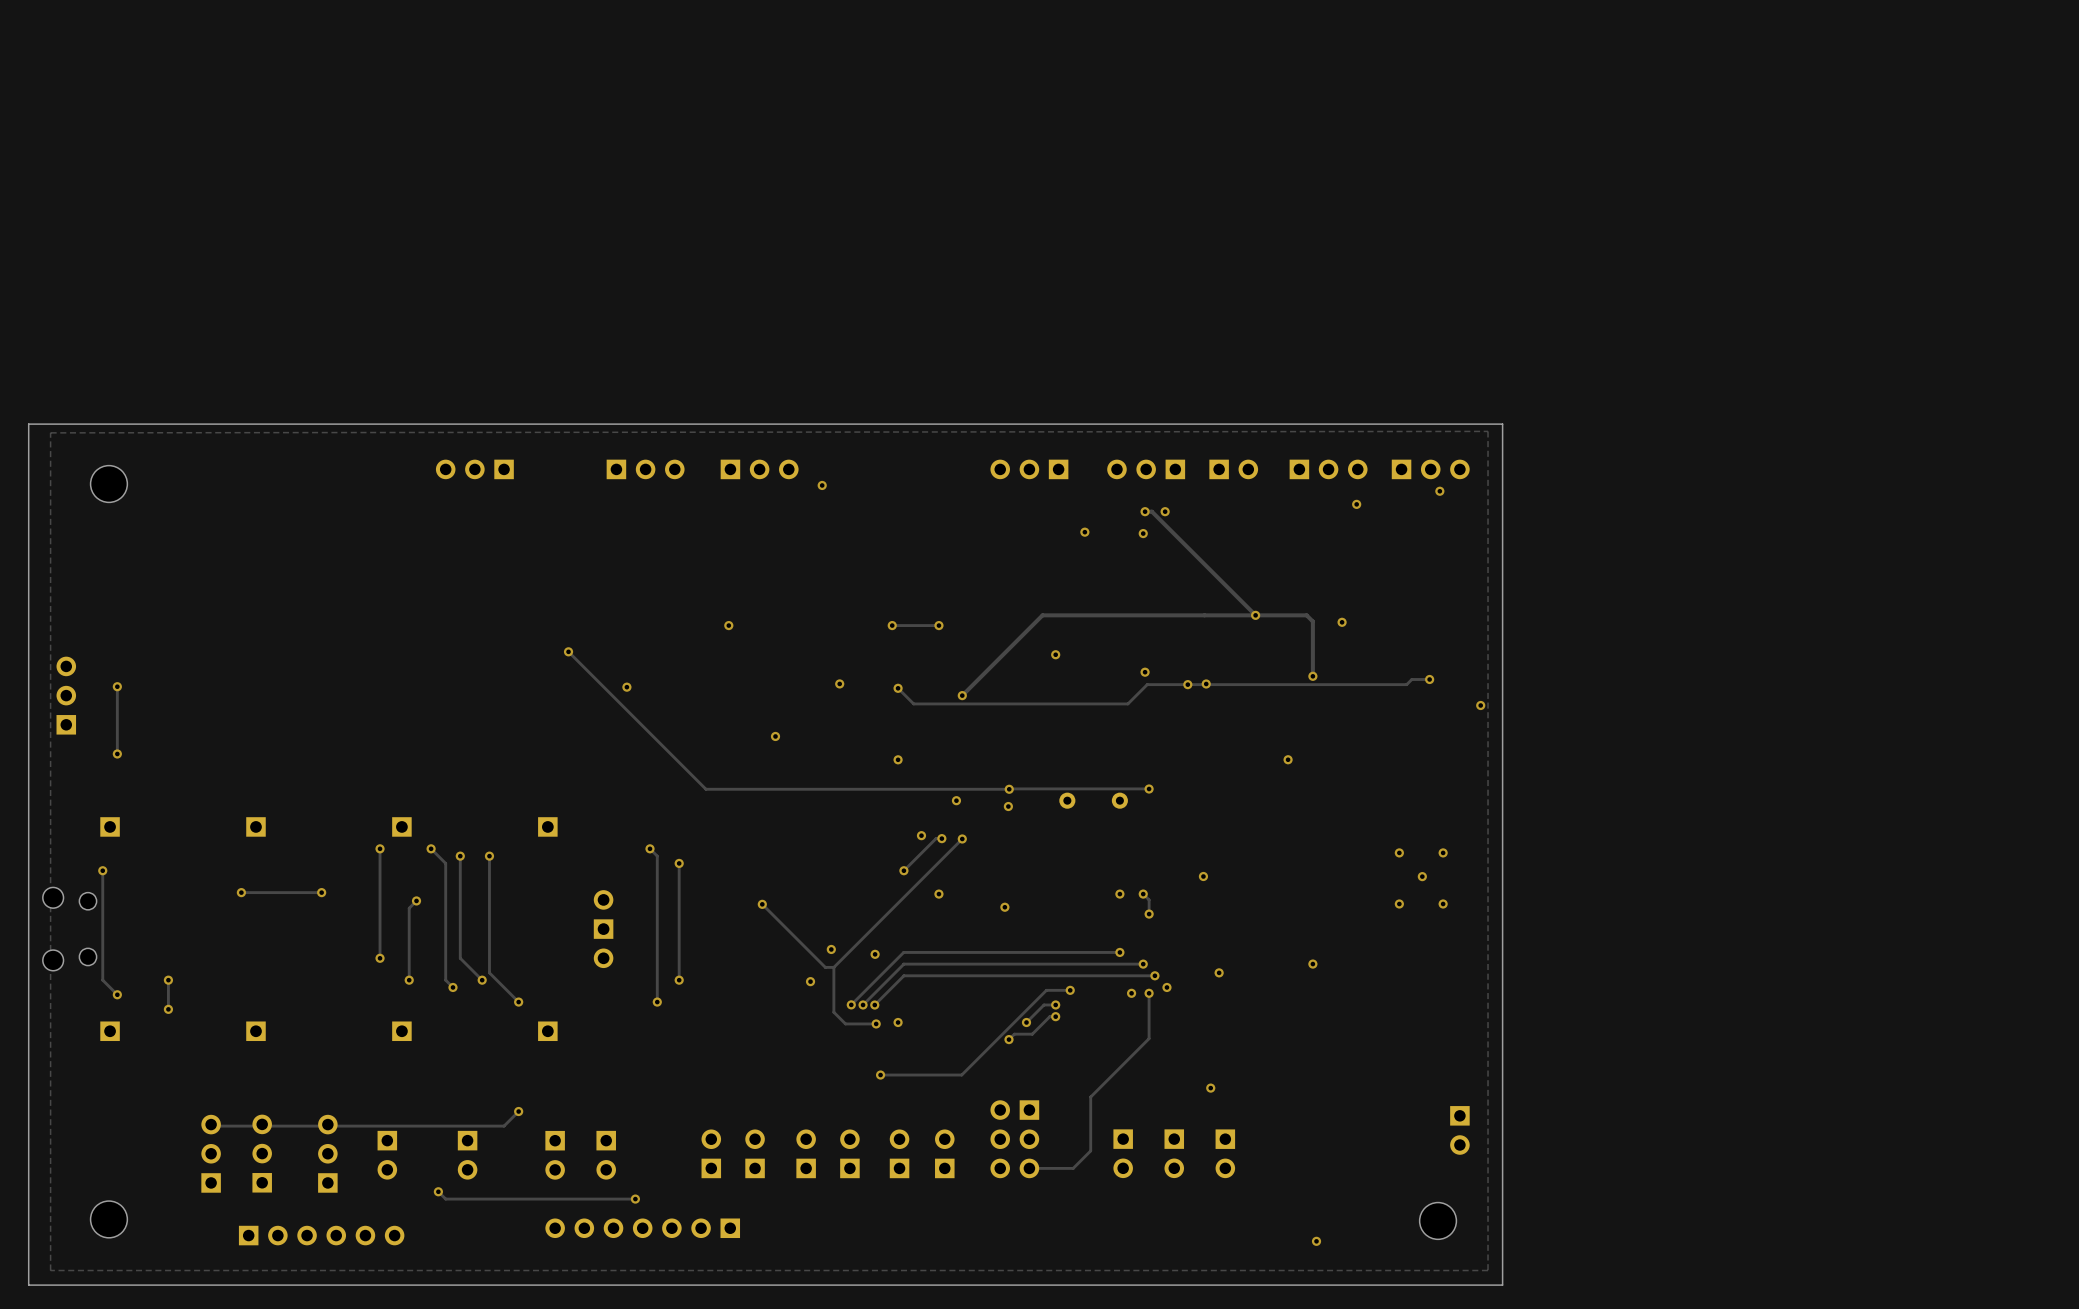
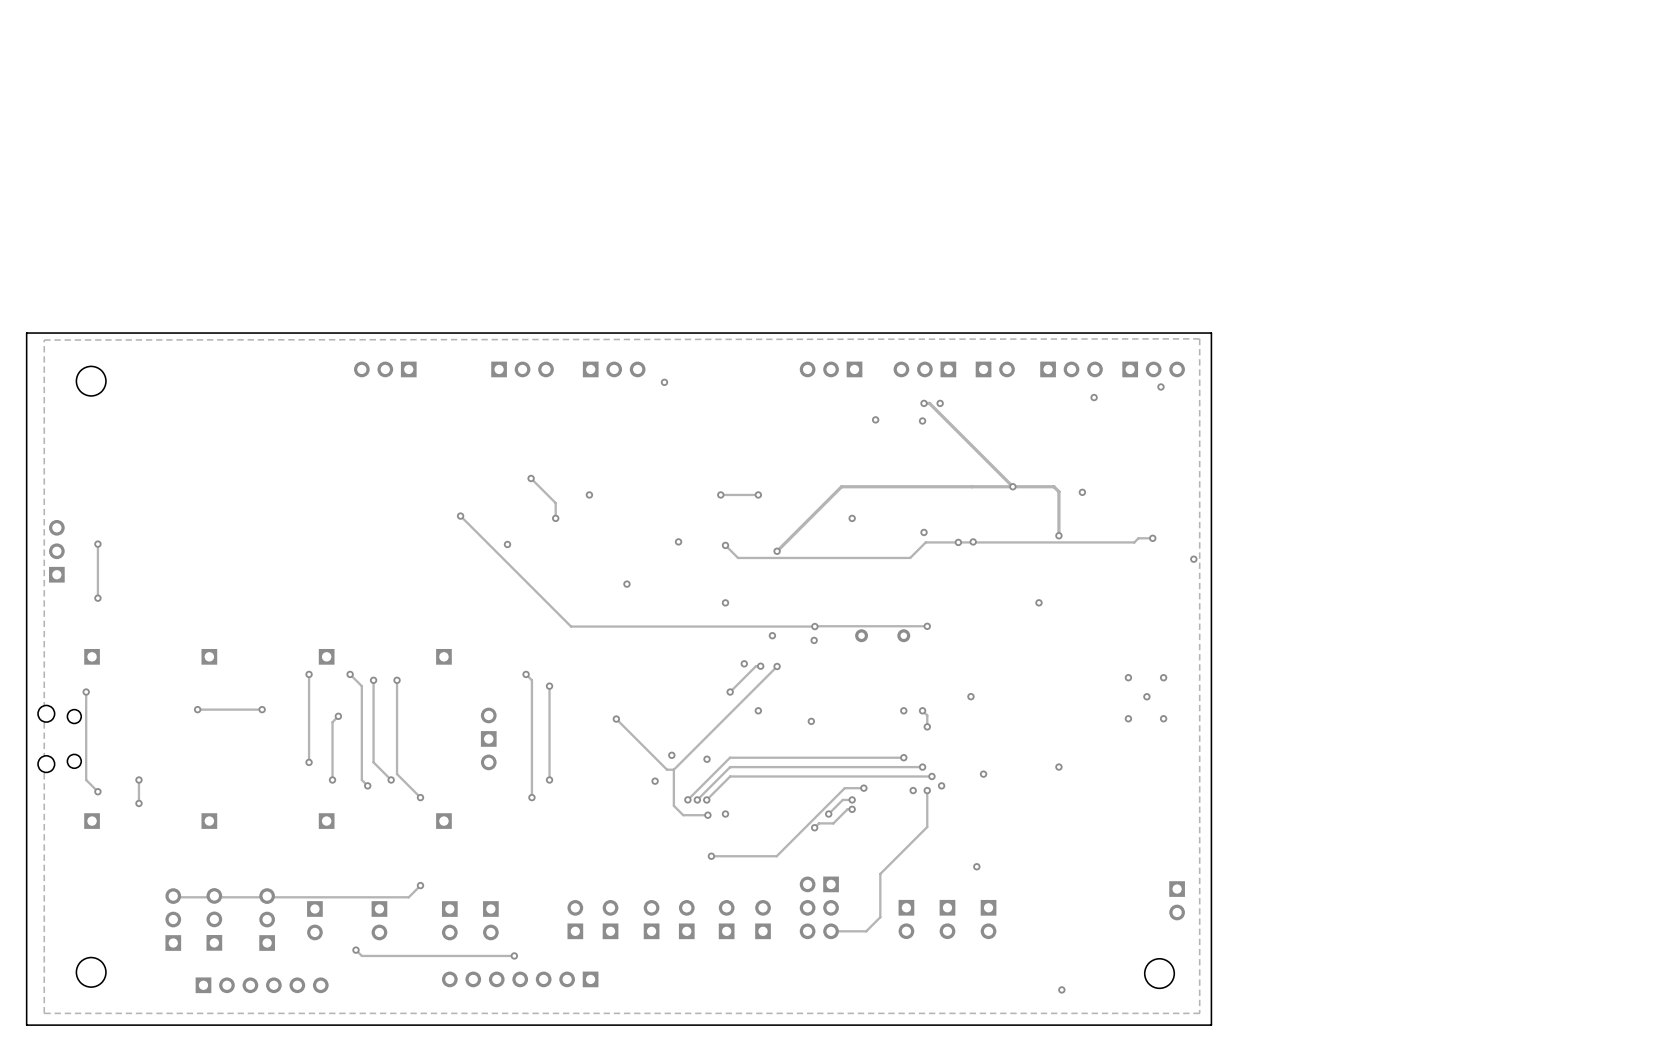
track: none -> (531, 478) (555, 503) (555, 518)
via: none -> (531, 478)
via: none -> (555, 518)

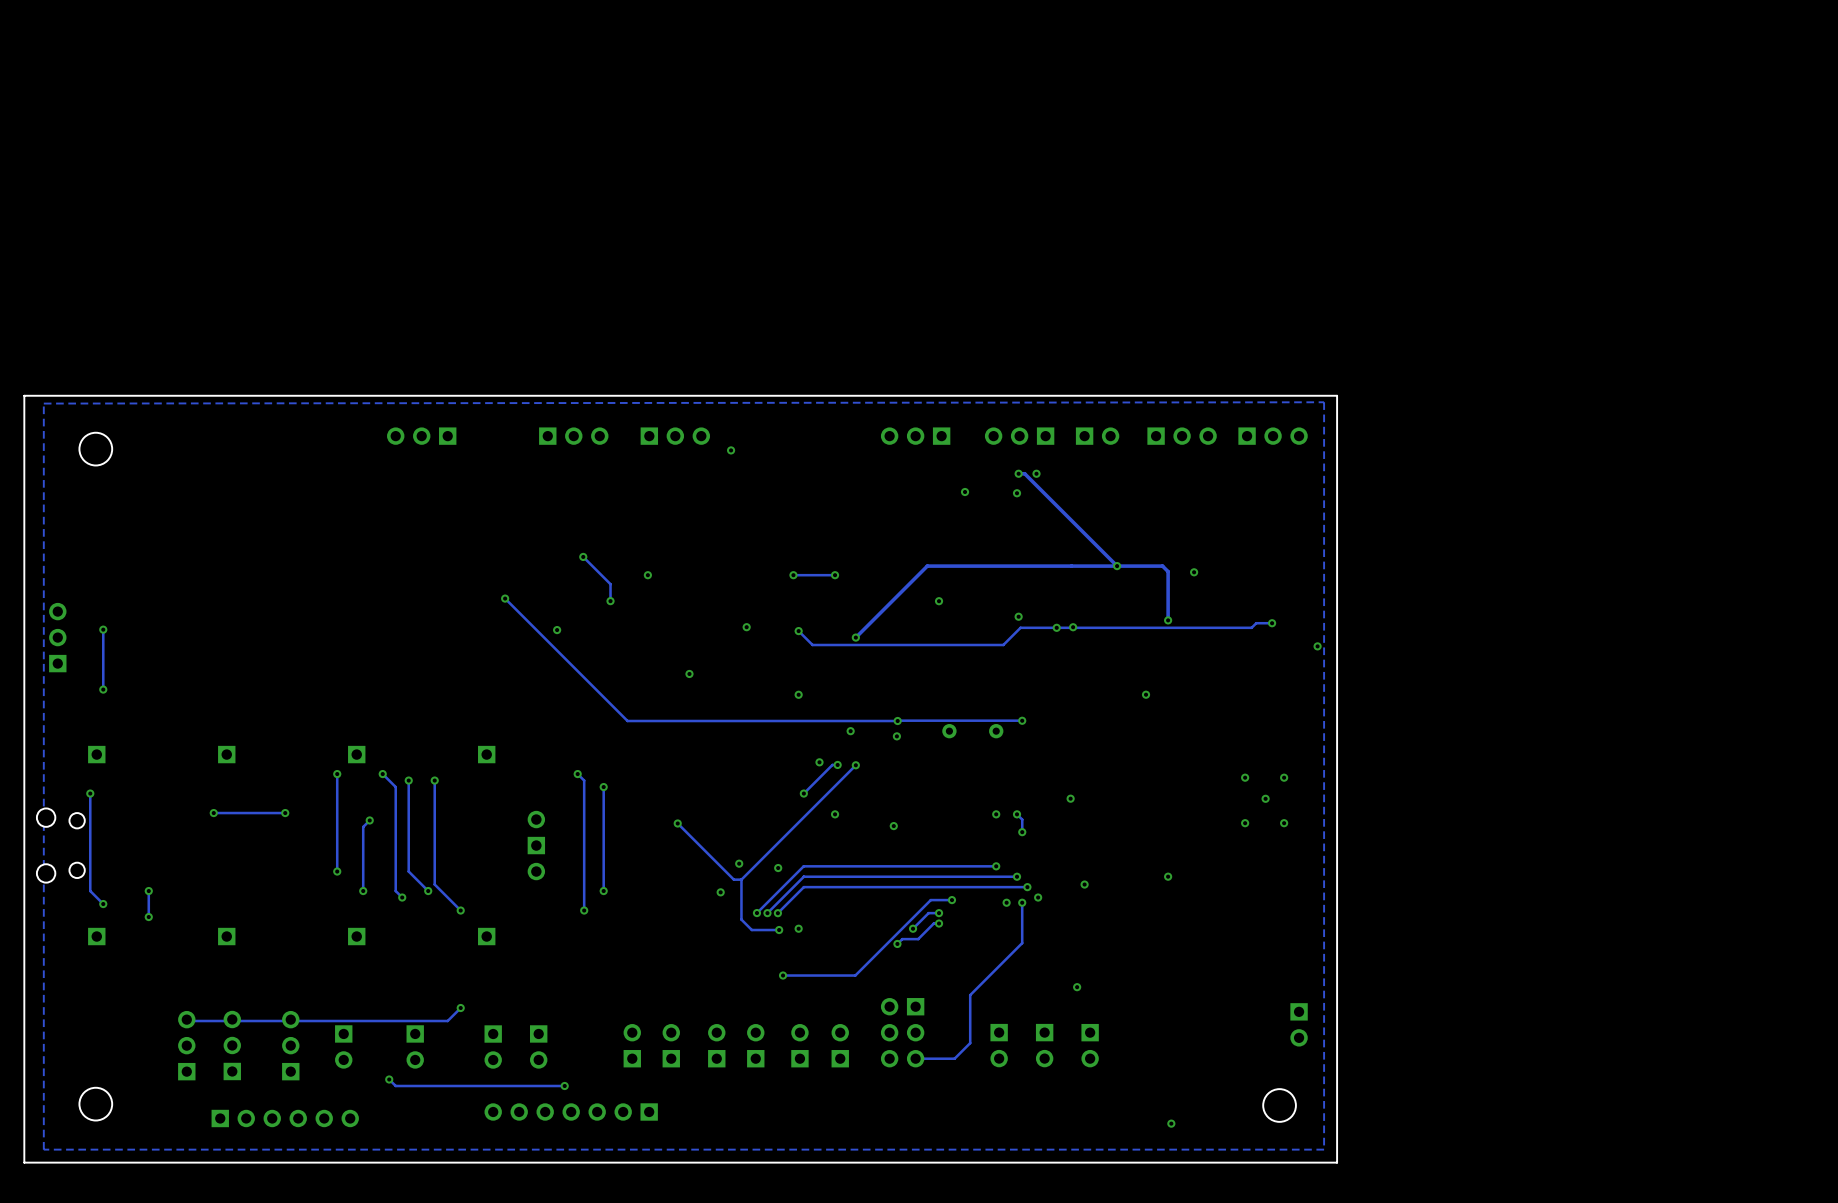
via: (1160, 386) -> none
via: (1094, 397) -> none

